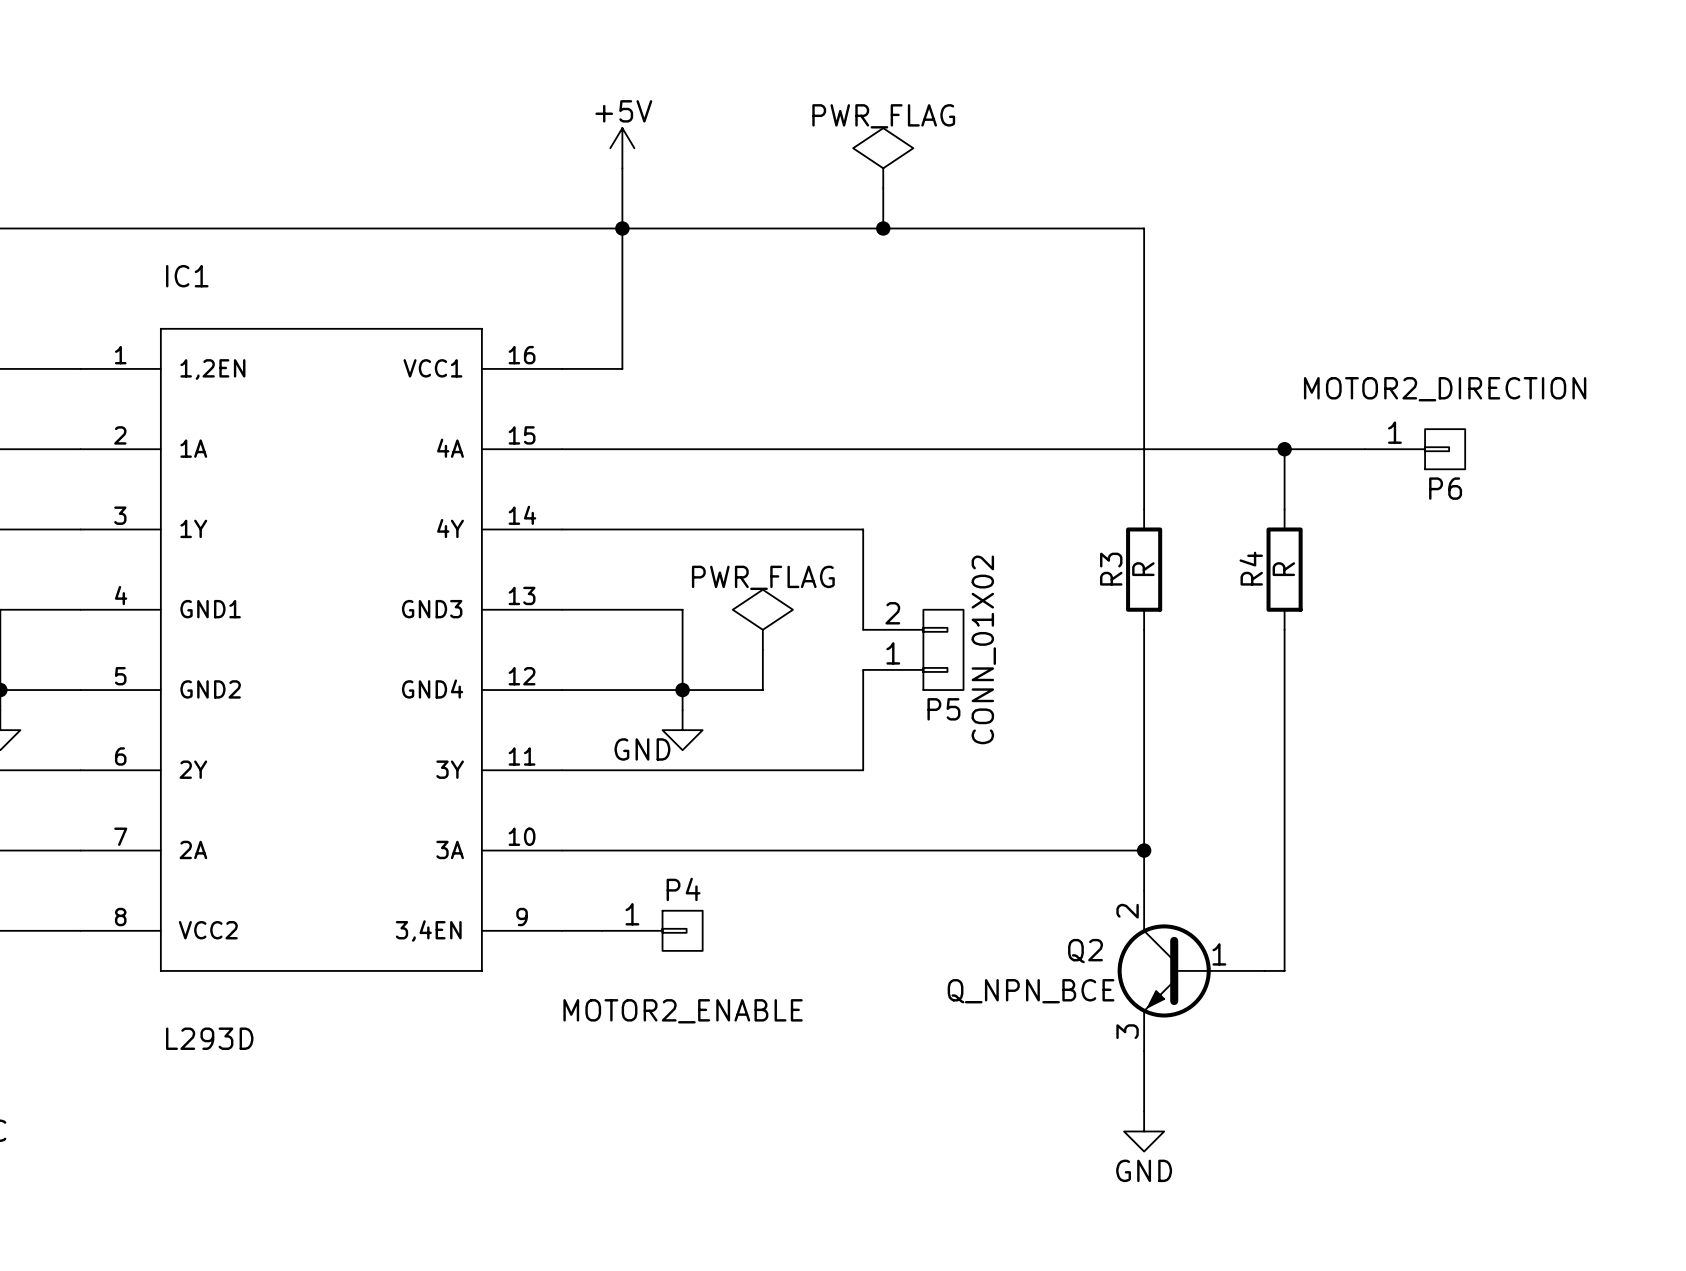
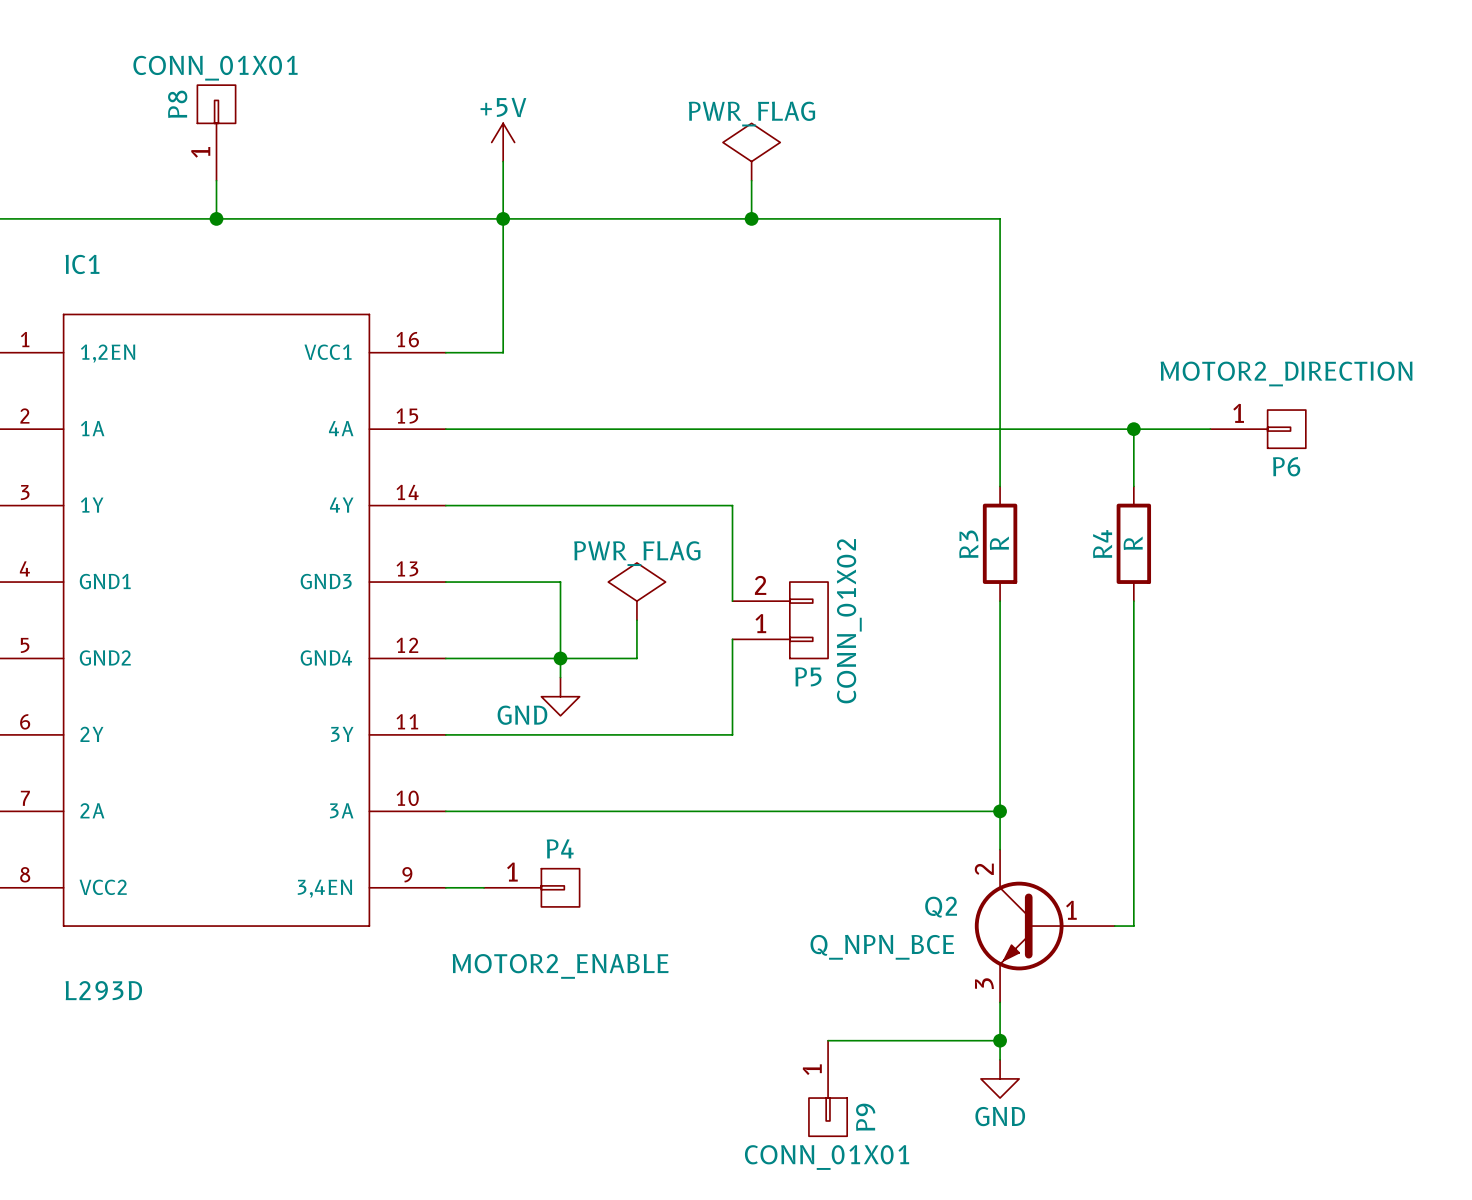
P8: none -> CONN_01X01 (216, 132)
wire: none -> (216, 180) (216, 218)
junction: none -> (216, 218)
wire: none -> (828, 1040) (1000, 1040)
junction: none -> (1000, 1040)
P9: none -> CONN_01X01 (828, 1088)

